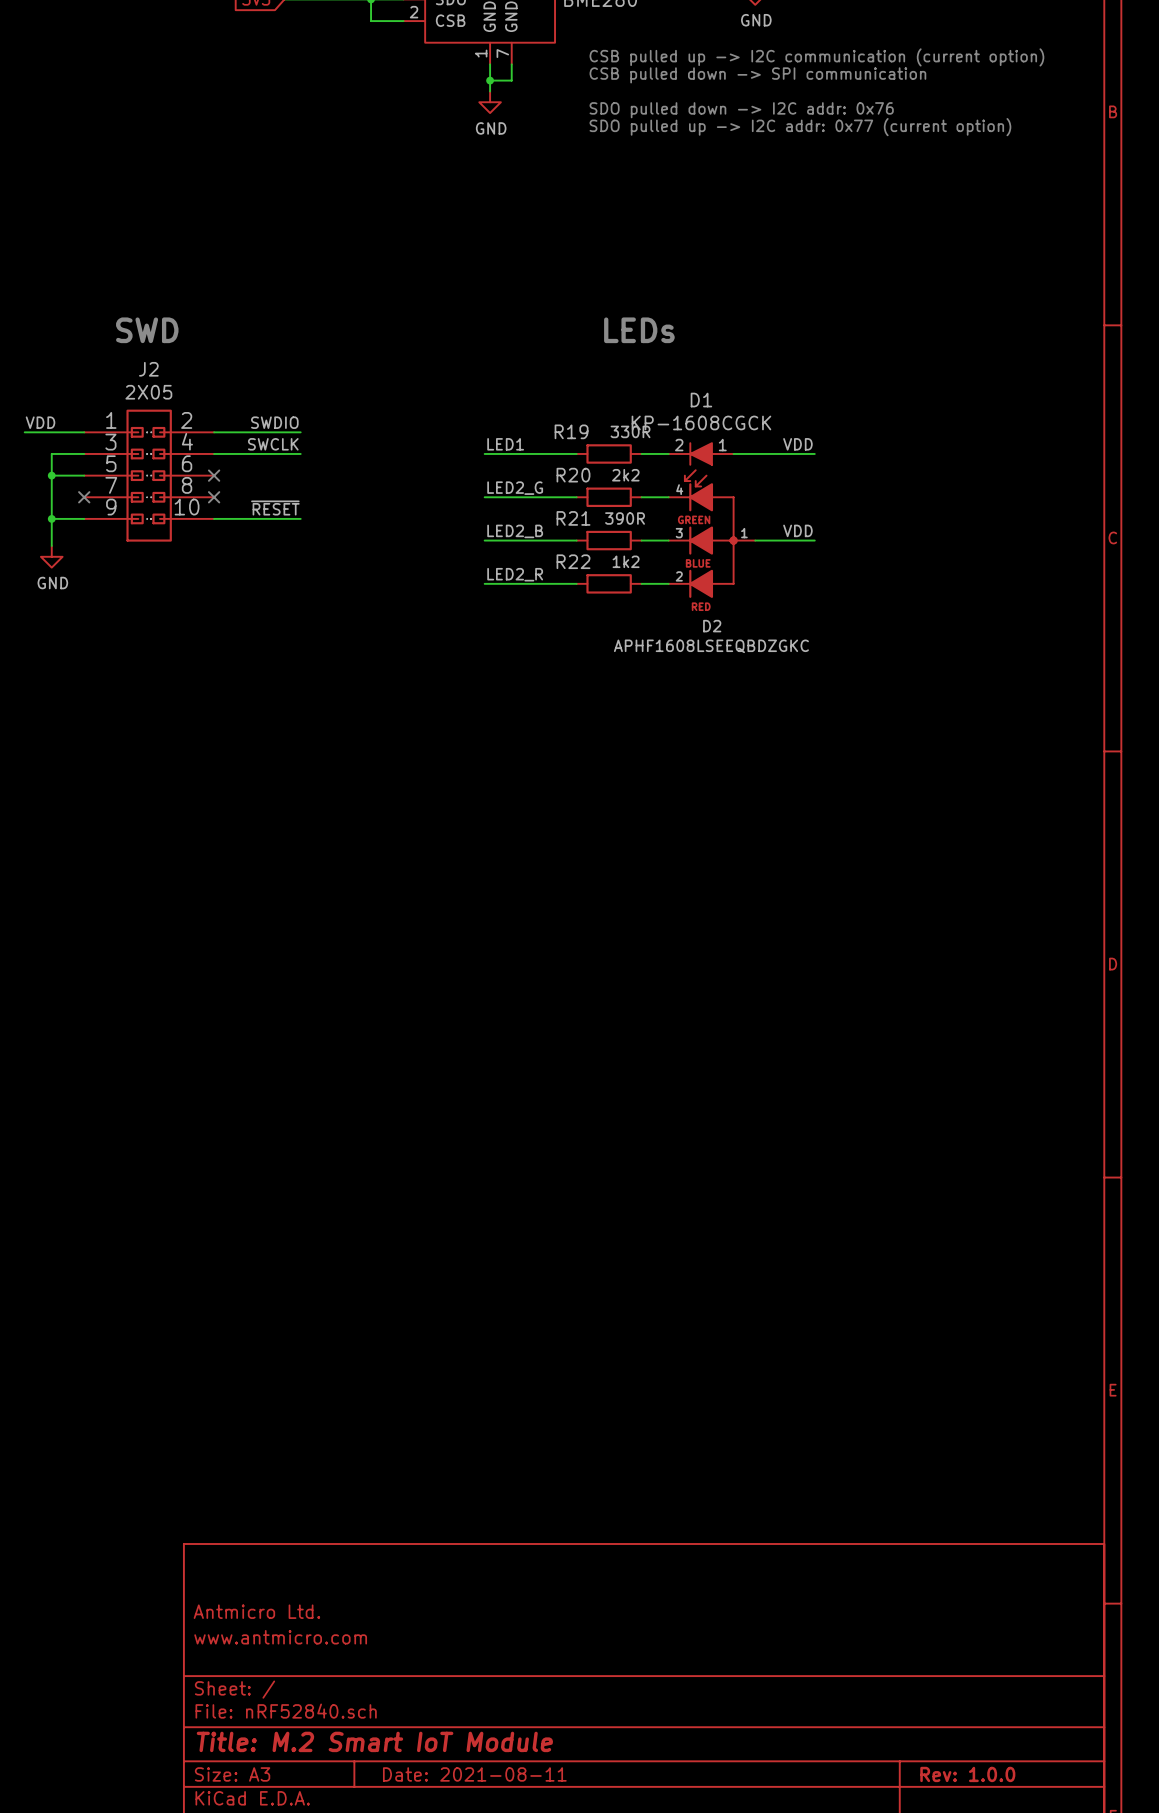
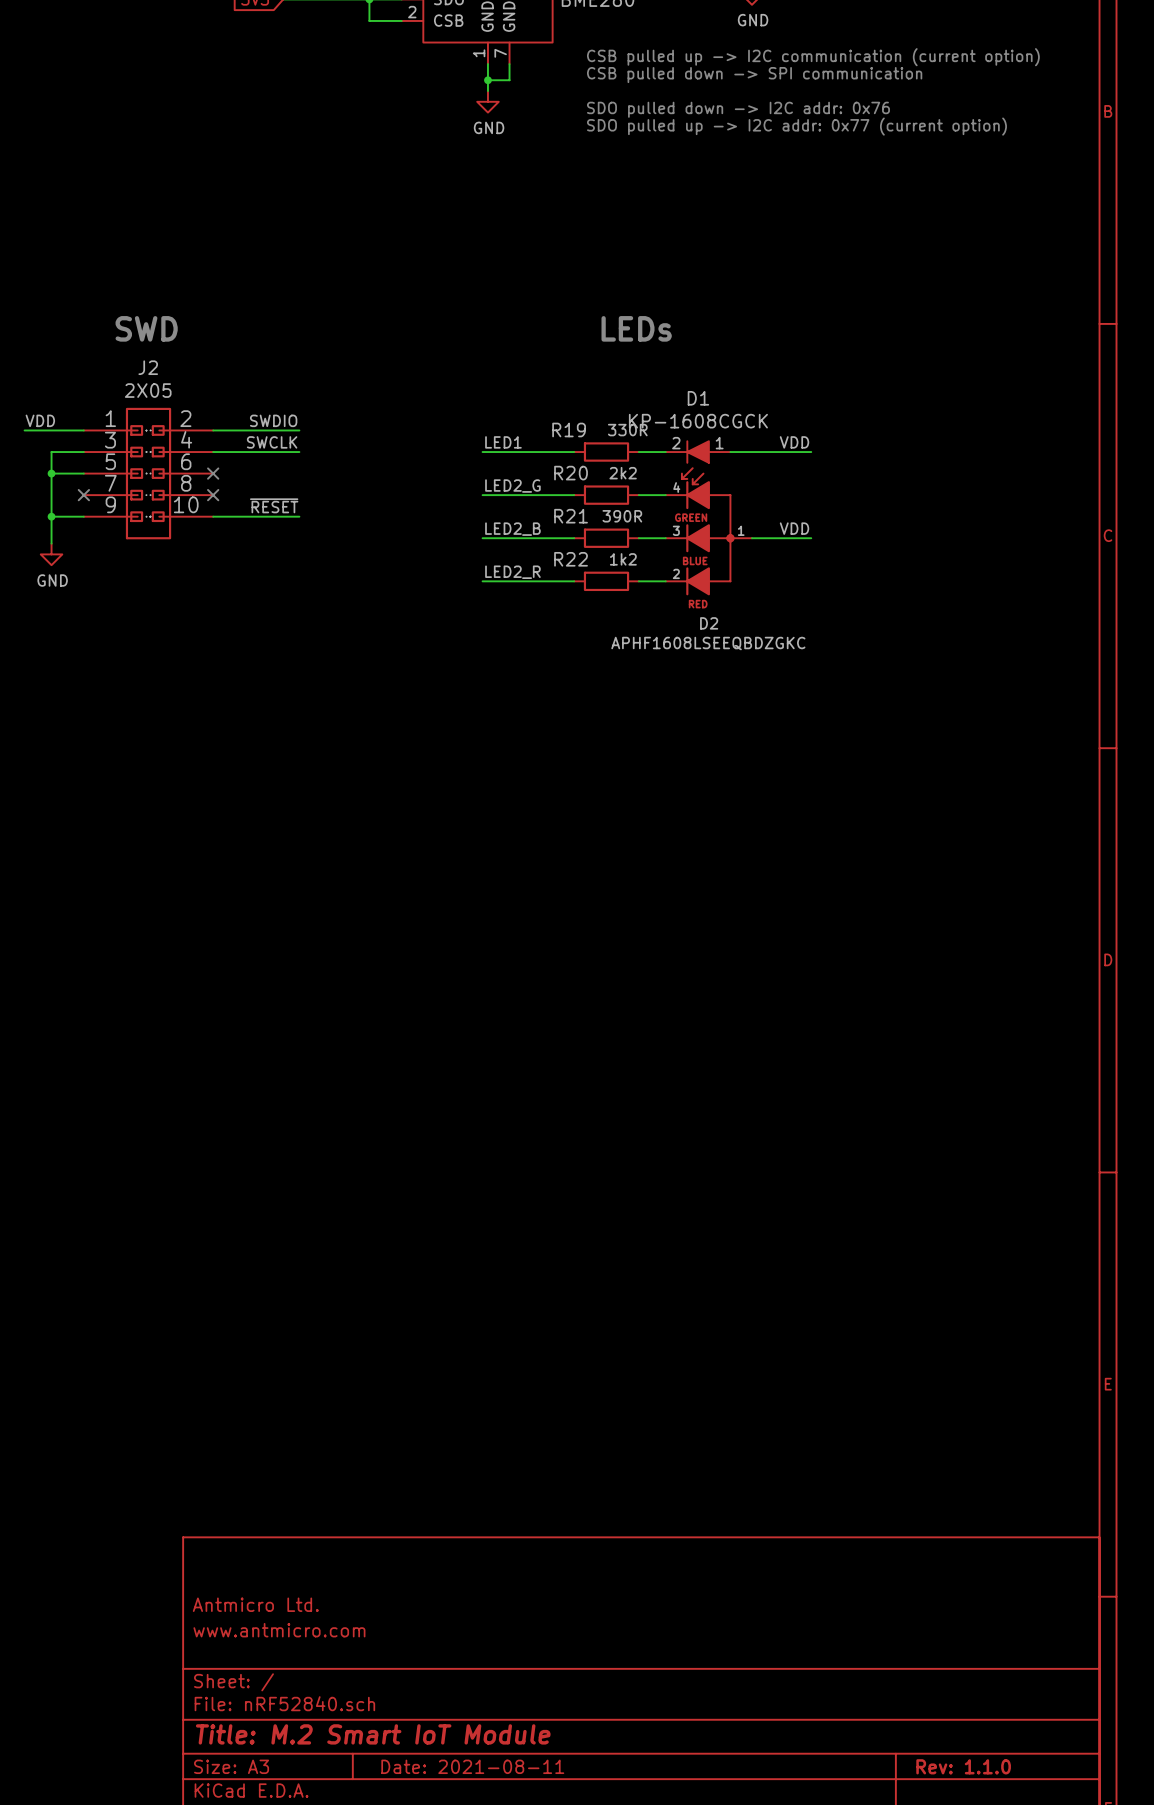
title block: Rev: 1.0.0 (967, 1774) -> Rev: 1.1.0 (963, 1766)

